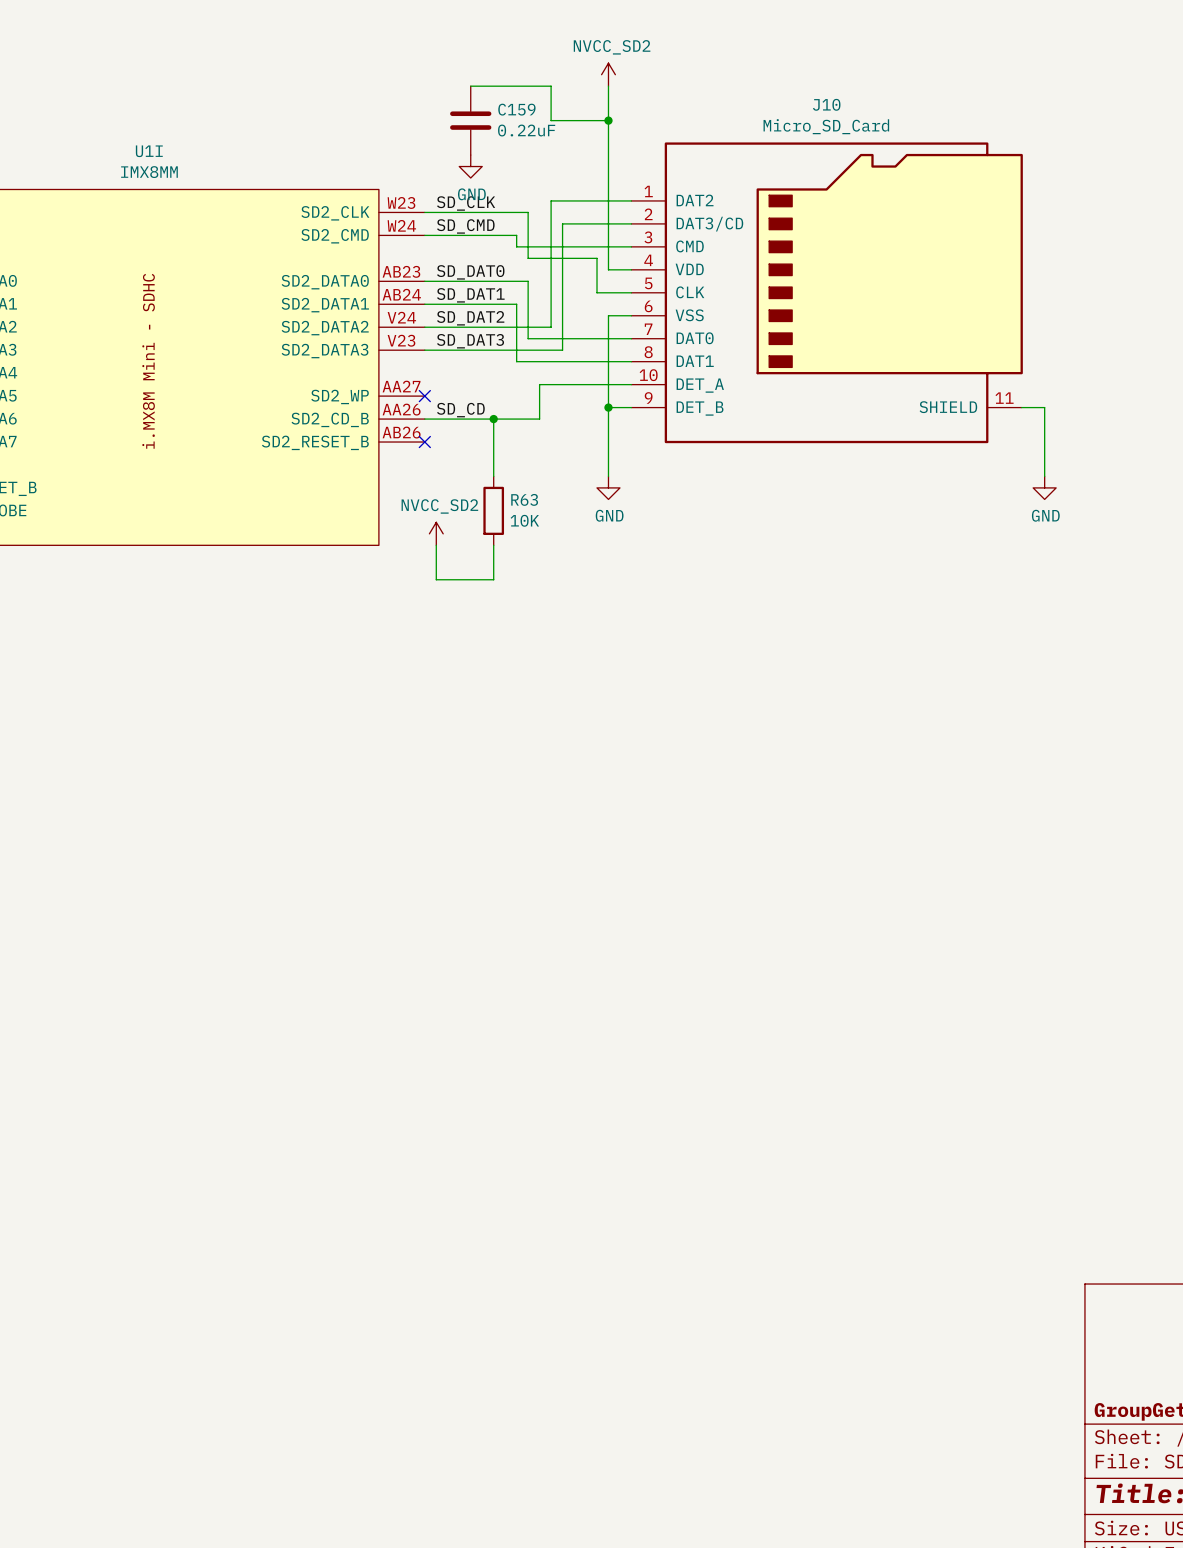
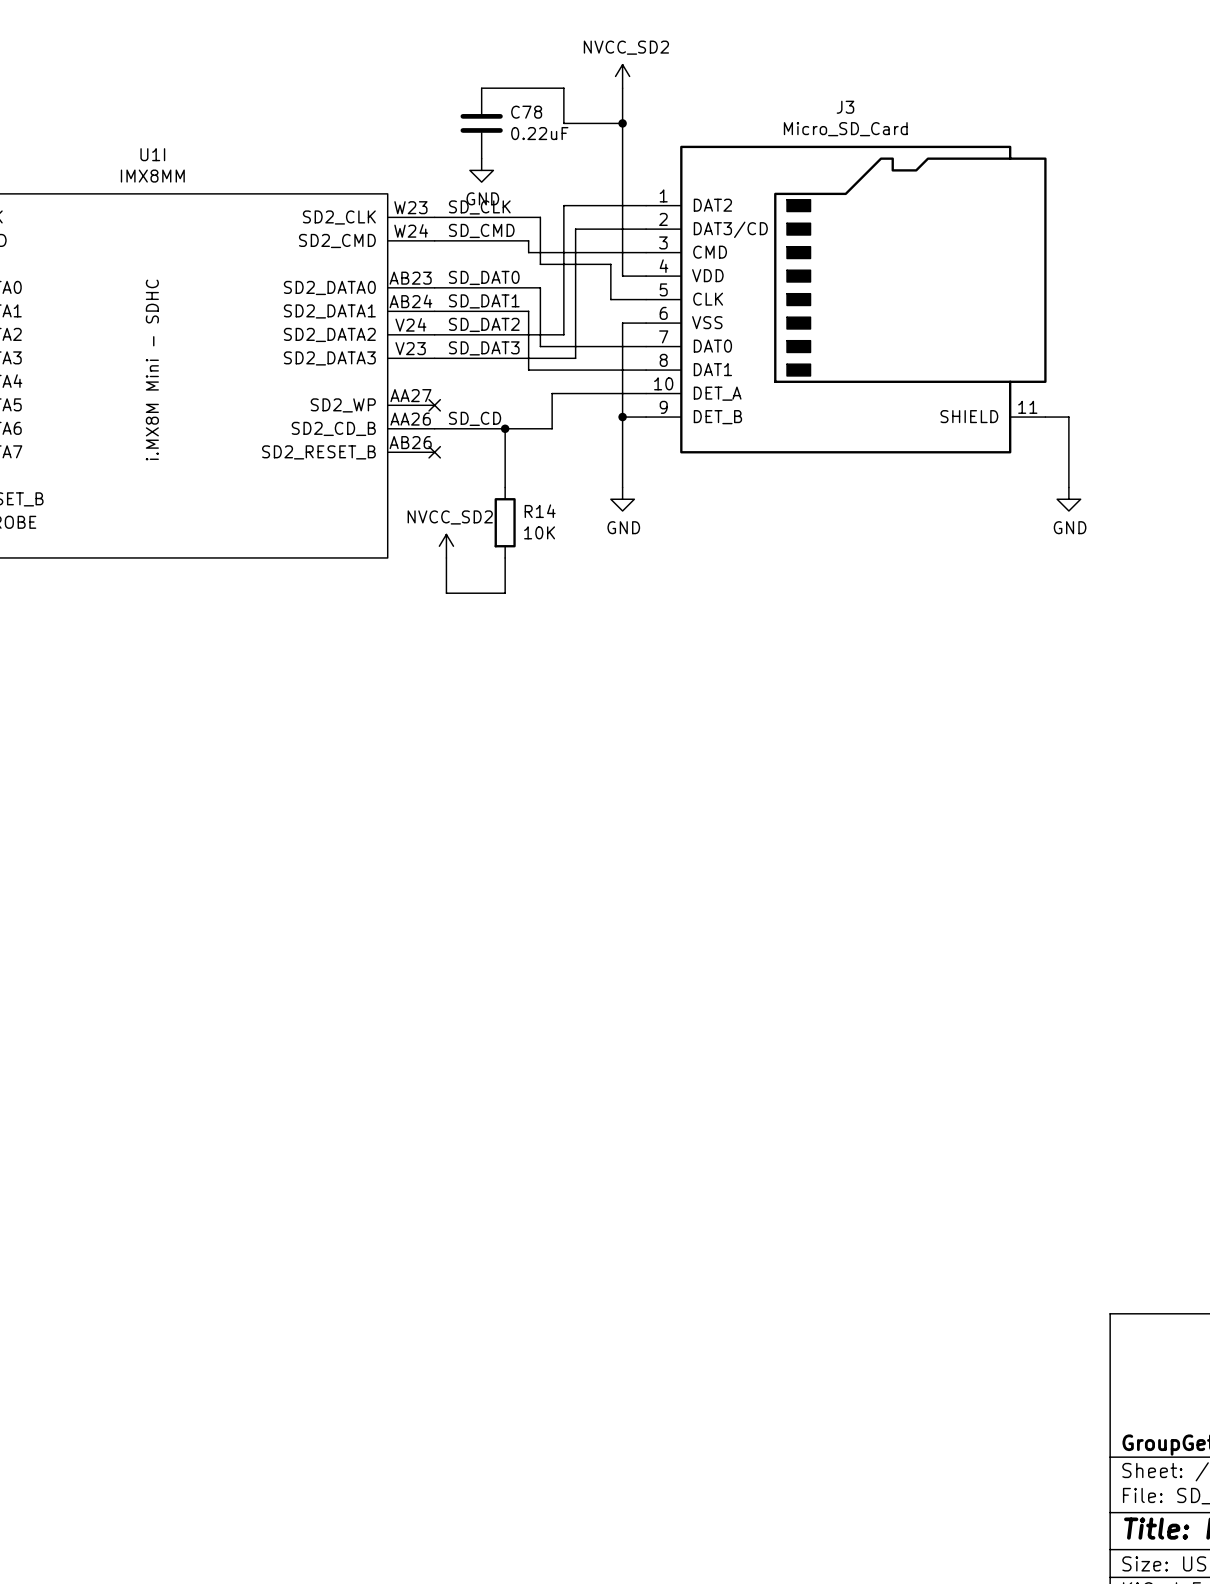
J10 name: J10 (826, 104) -> J3 (845, 107)
C159 name: C159 (516, 109) -> C78 (526, 112)
R63 name: R63 (524, 499) -> R14 (540, 511)

